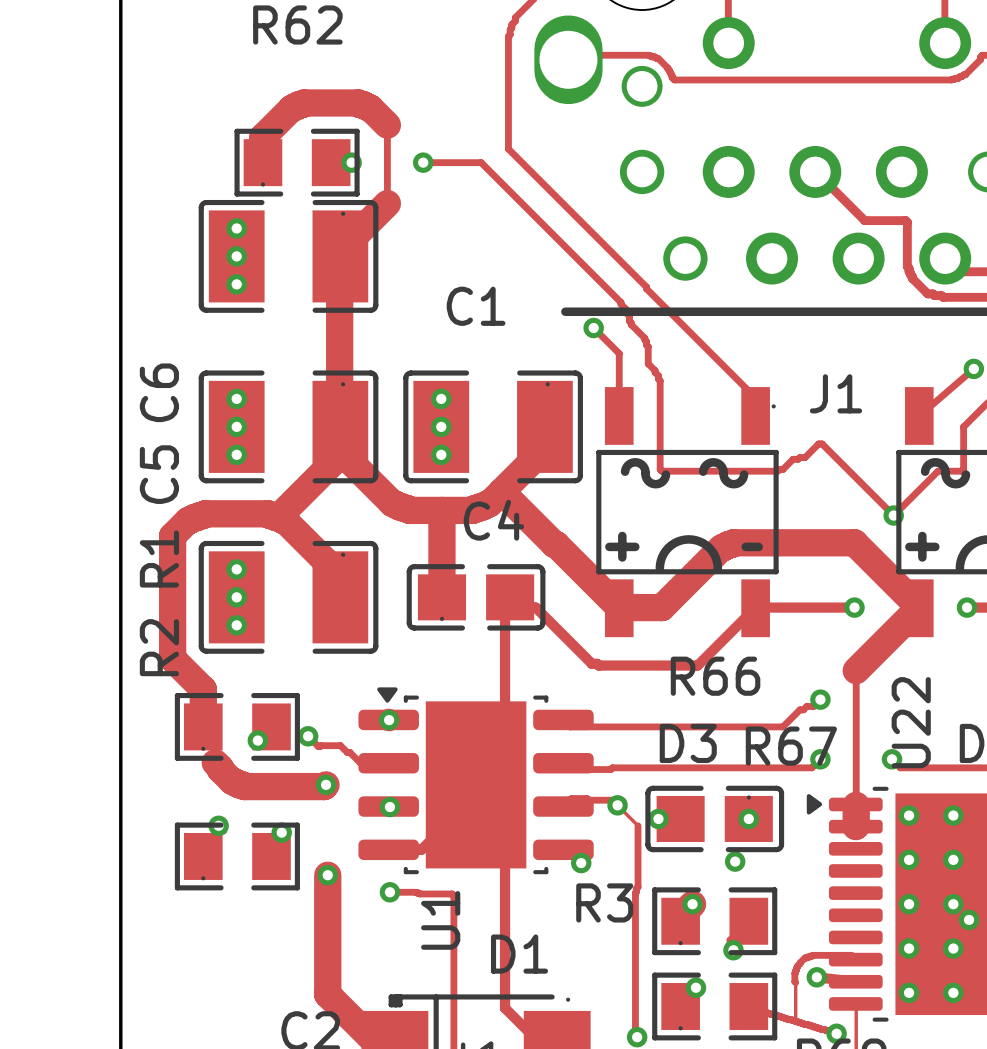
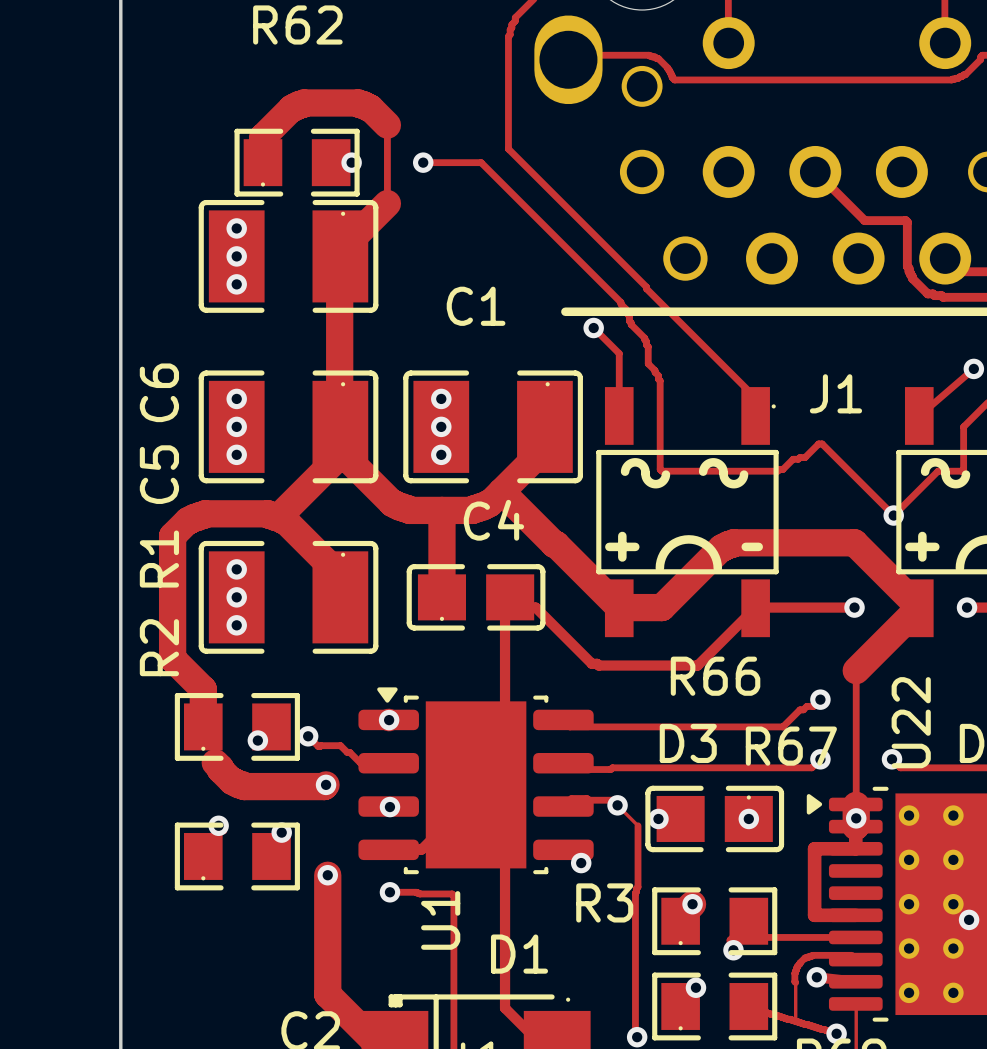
track: none -> (855, 826) (855, 848) (814, 848) (814, 915) (855, 915)
via position: (735, 861) -> (856, 818)
track: none -> (748, 921) (765, 937) (855, 937)

